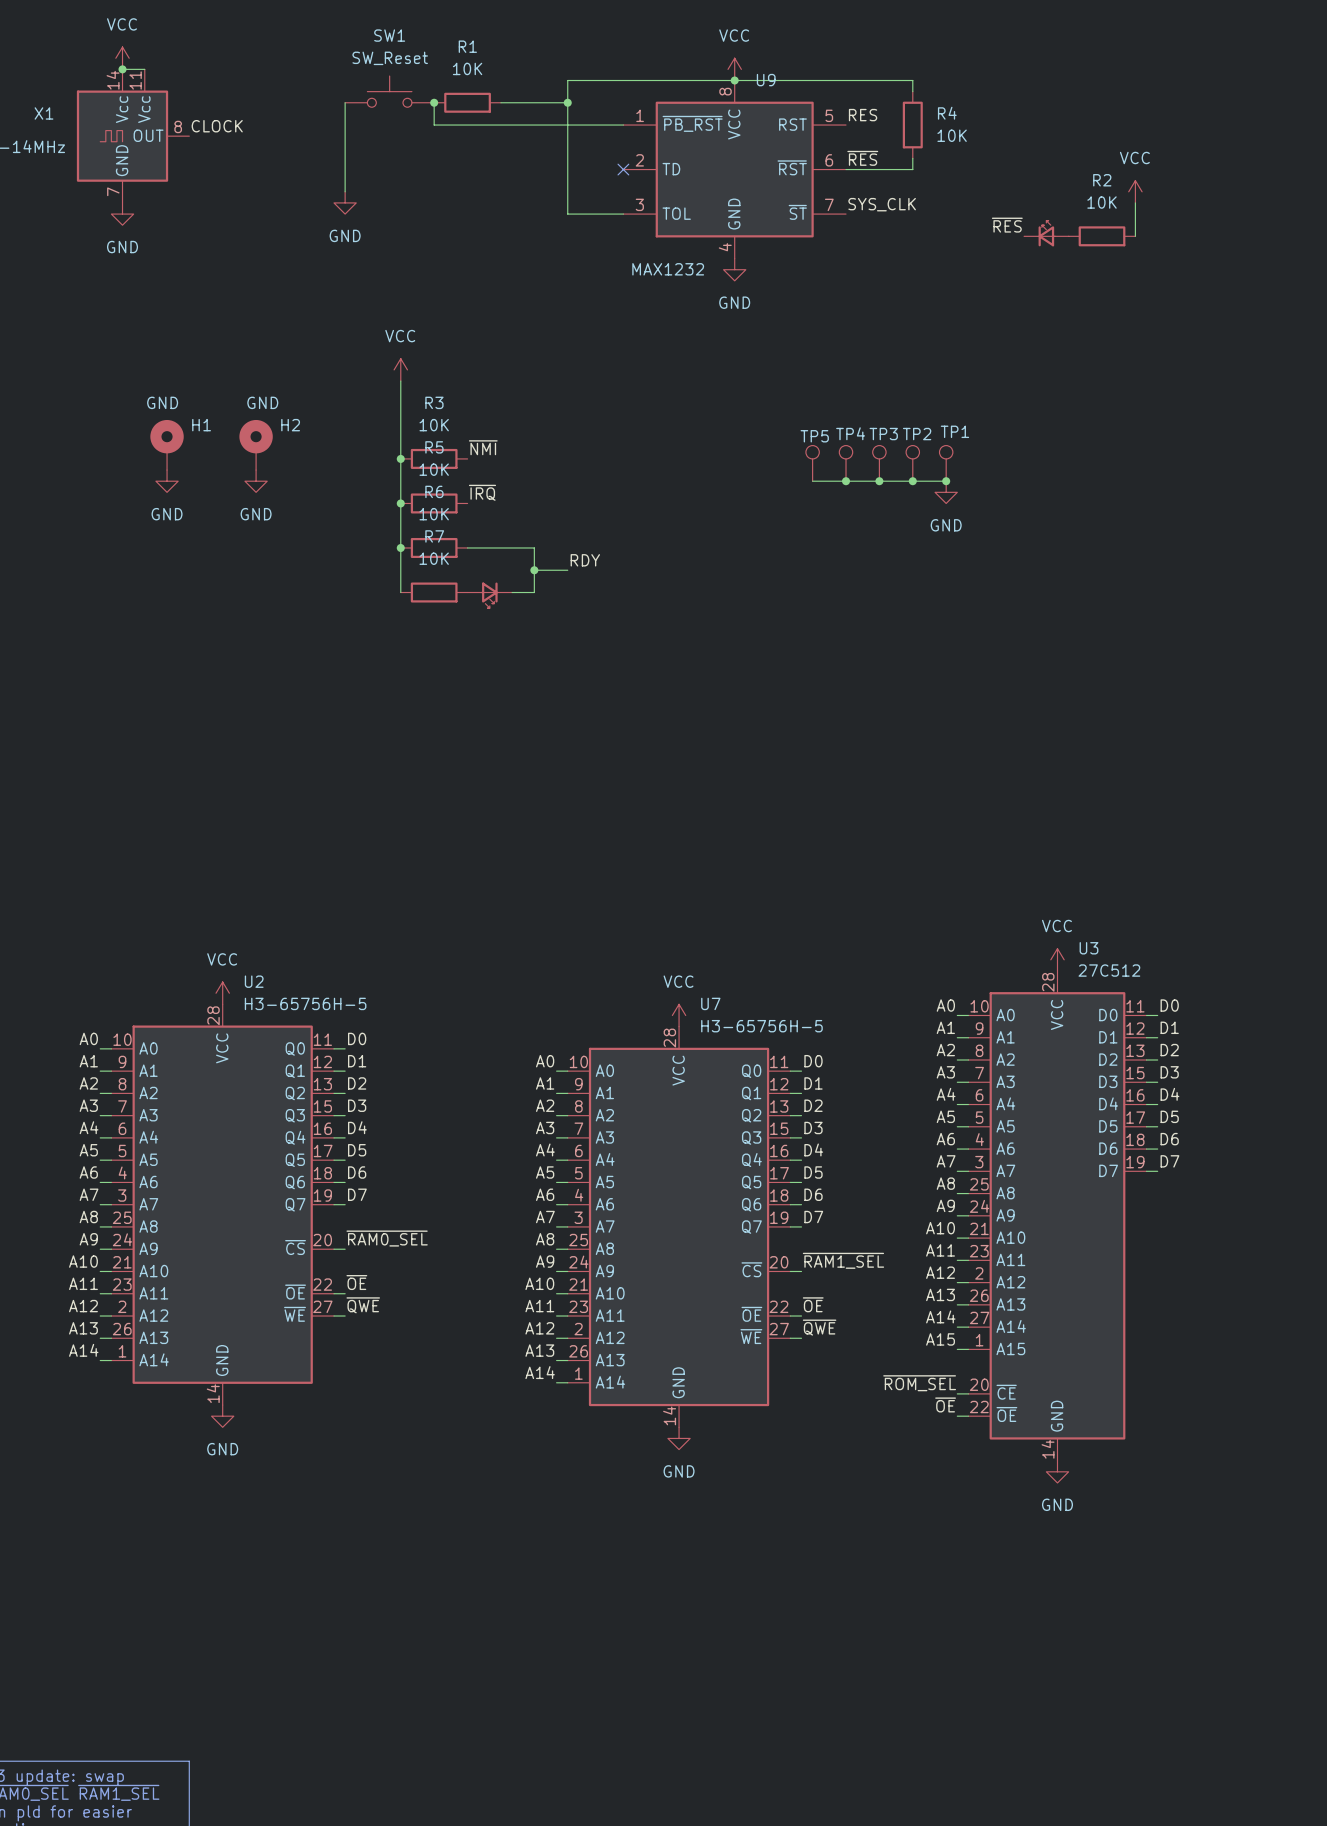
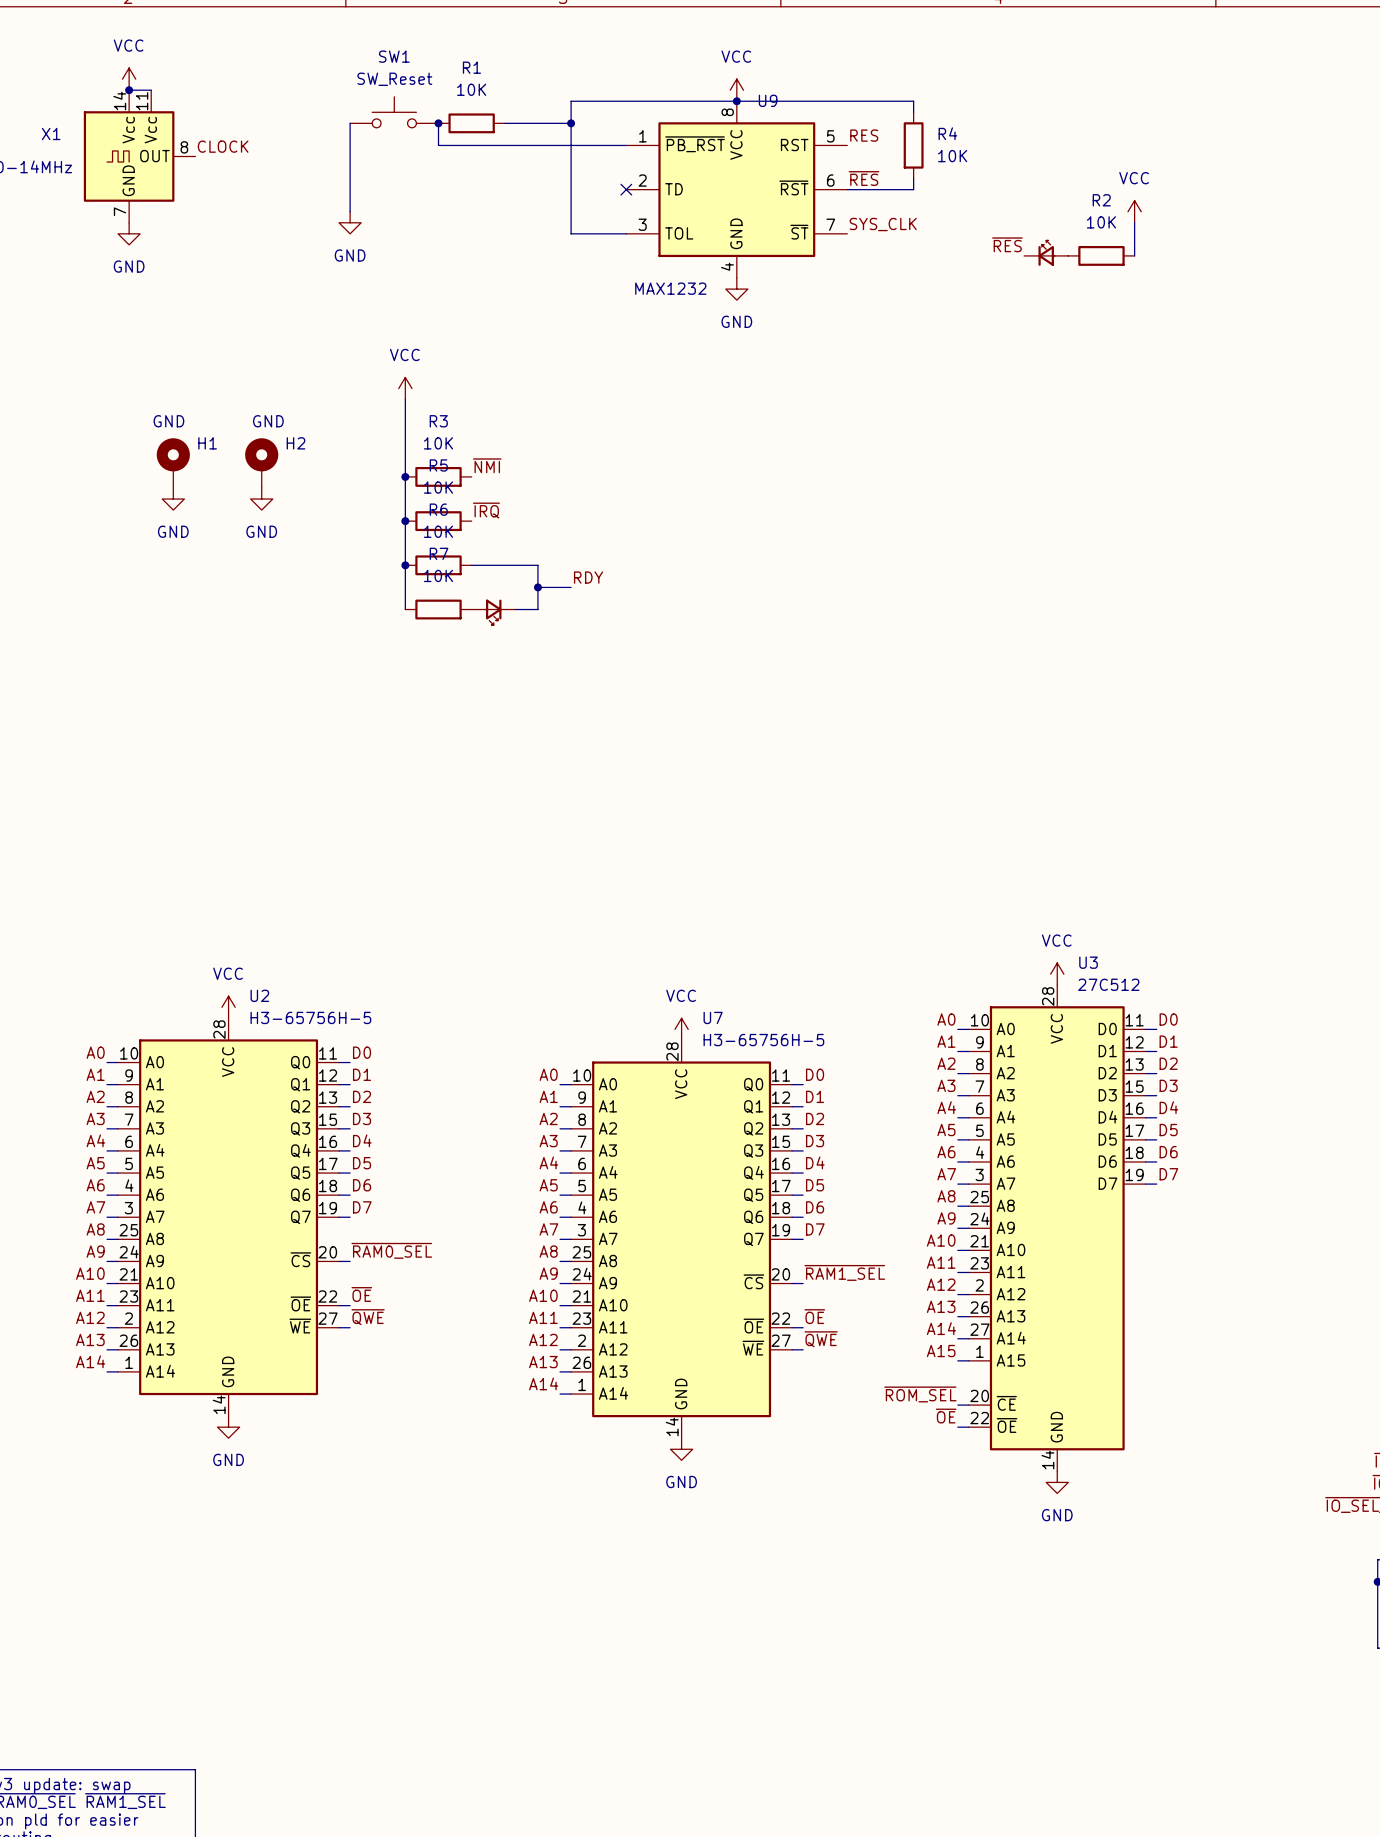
TP5: (812, 463) -> none
TP4: (846, 463) -> none
TP3: (879, 463) -> none
TP2: (912, 463) -> none
TP1: (946, 463) -> none
wire: (812, 481) (946, 481) -> none
junction: (846, 481) -> none
junction: (879, 481) -> none
junction: (912, 481) -> none
junction: (946, 481) -> none
power symbol: GND (946, 492) -> none

